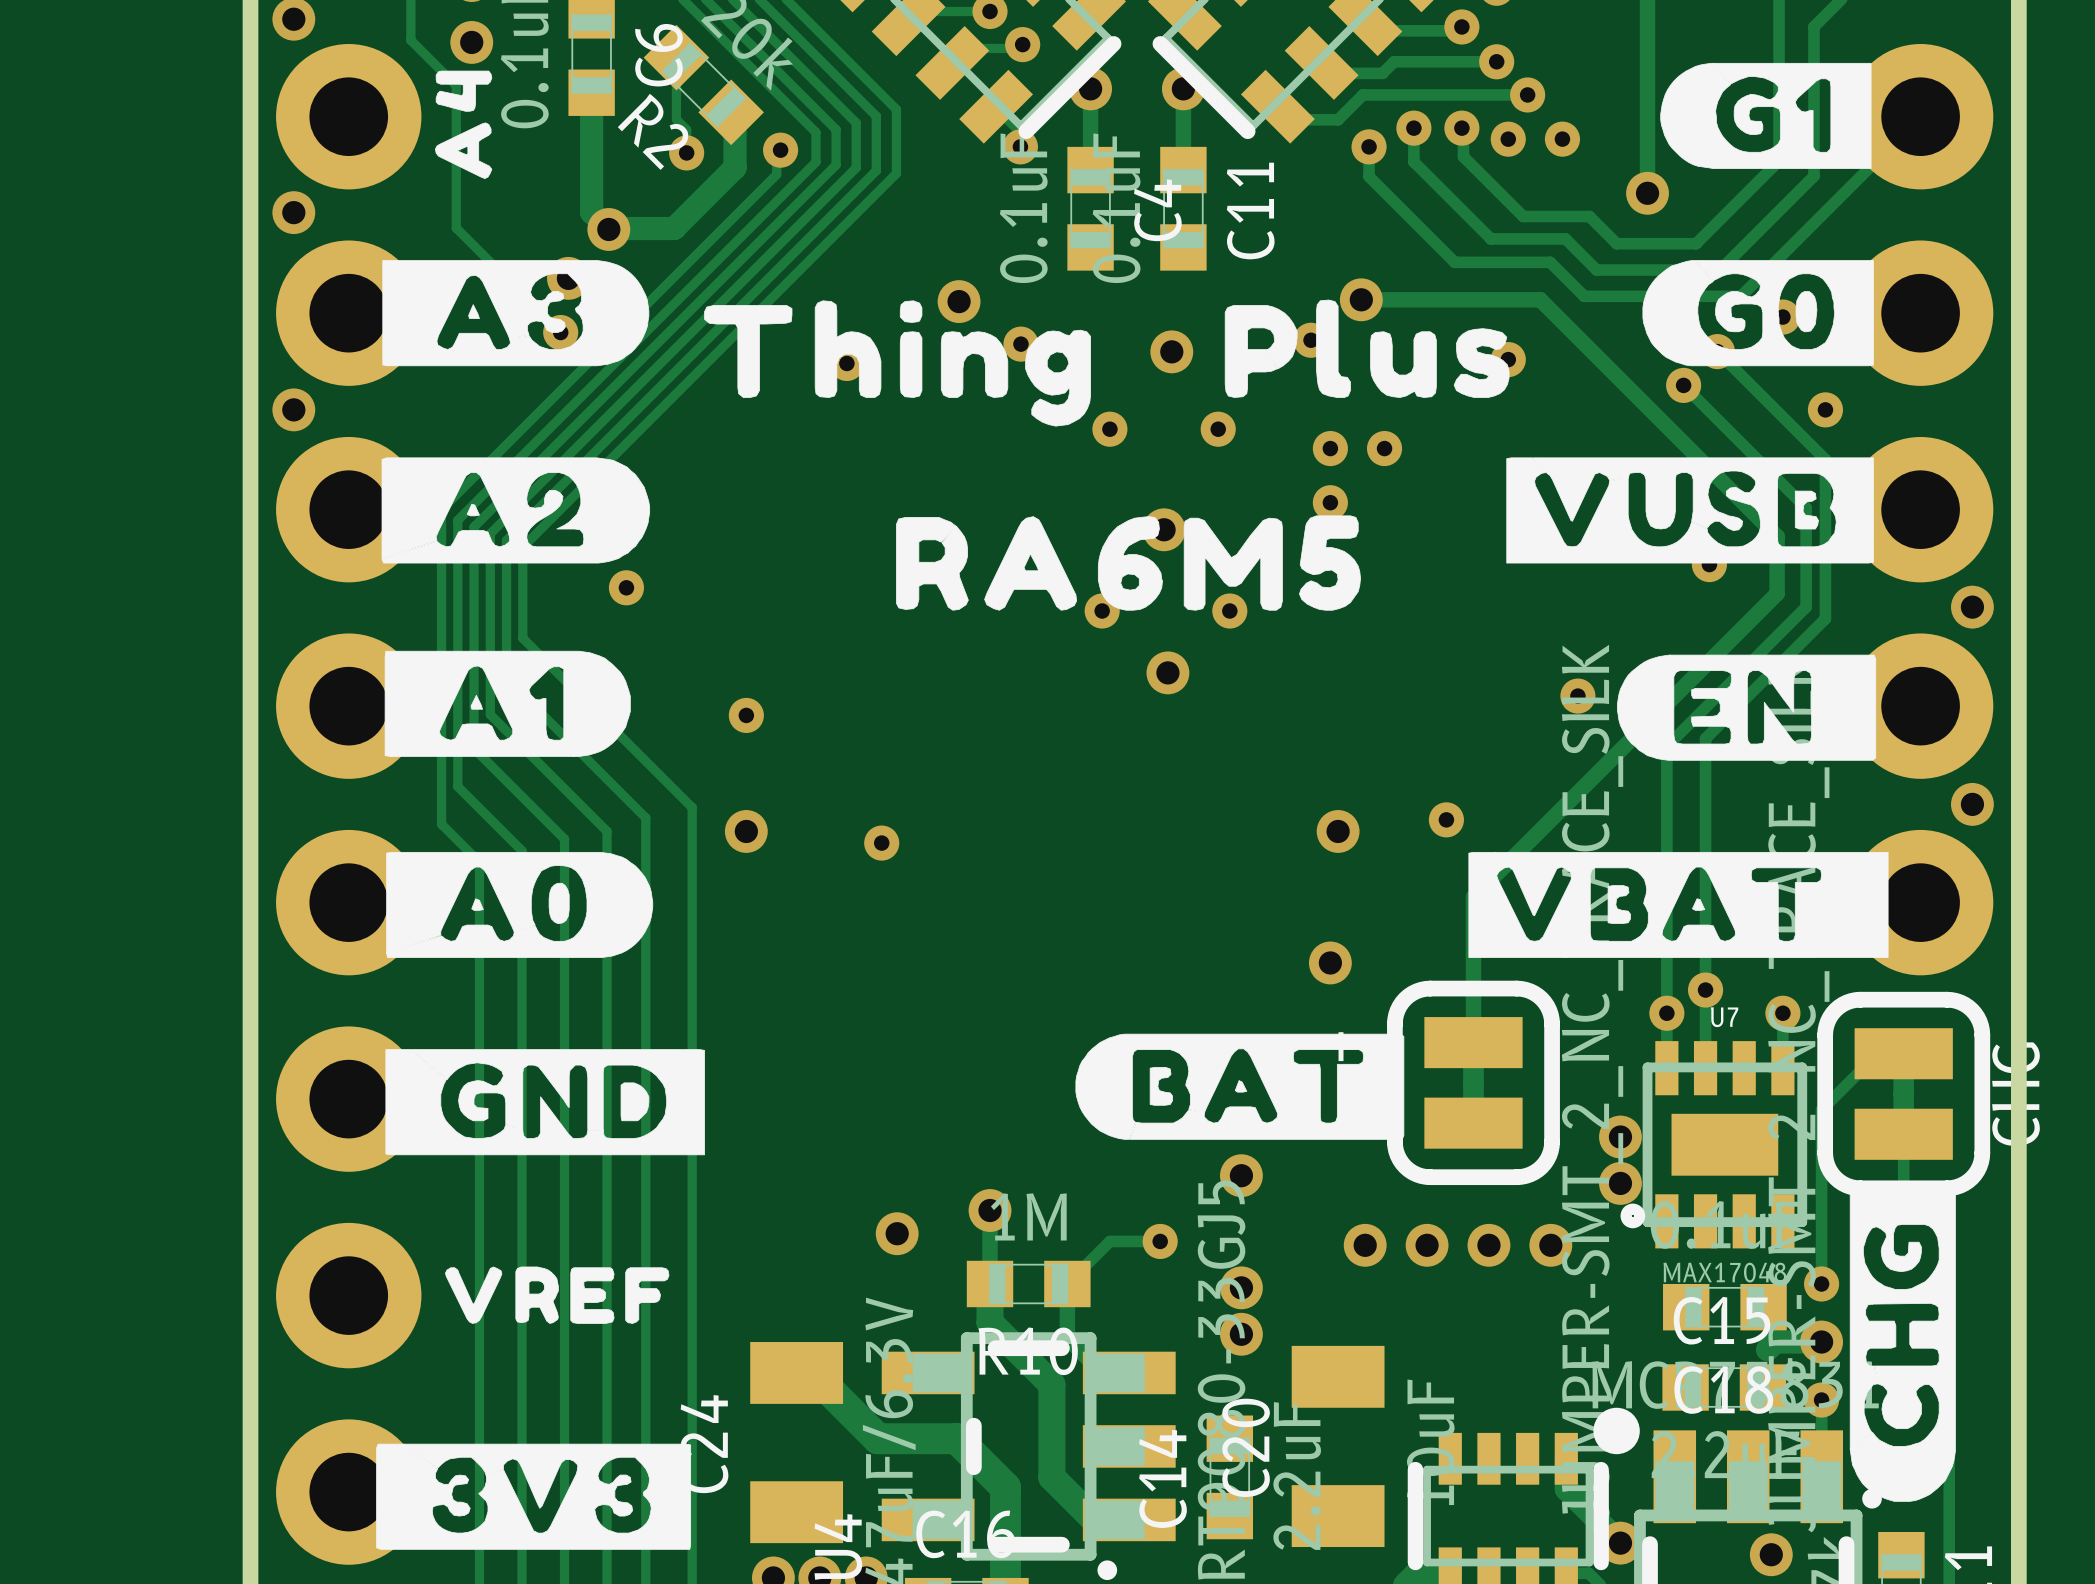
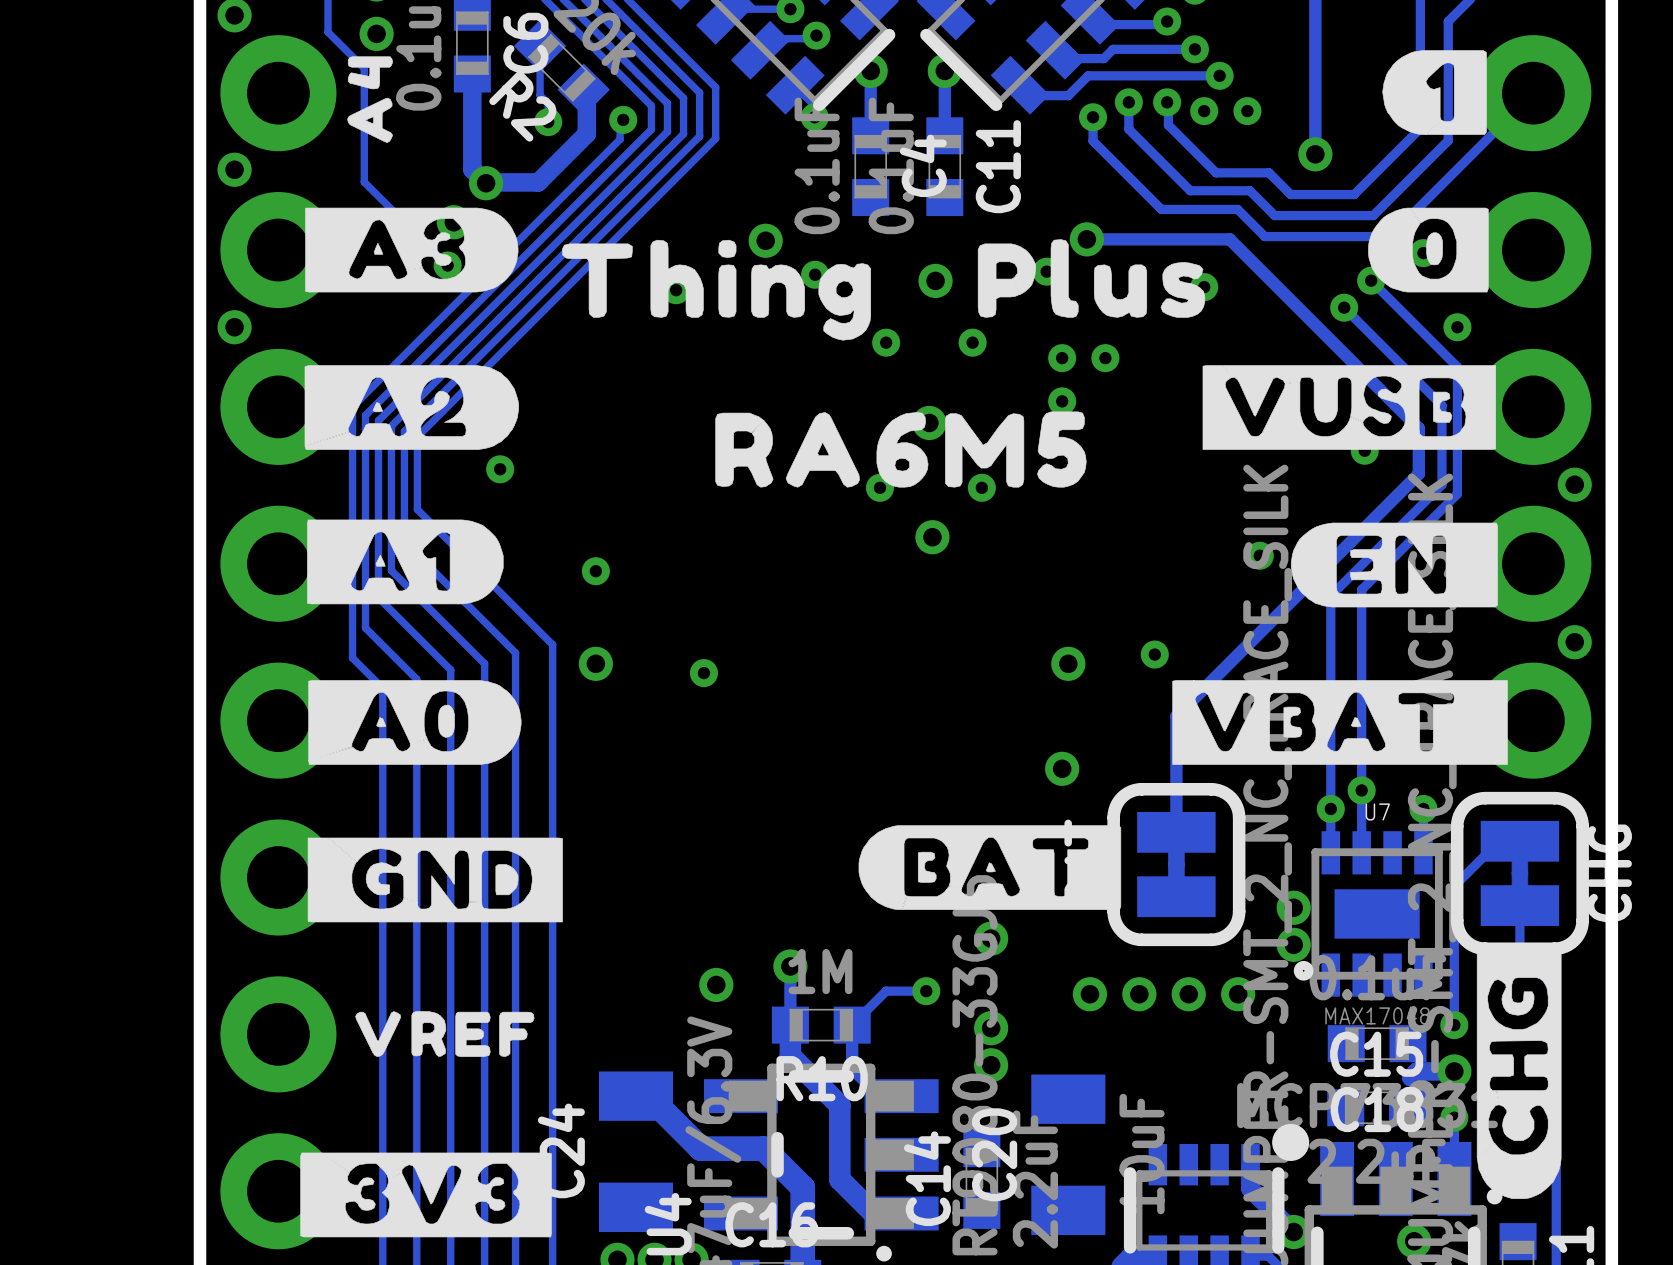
drawing shape: [1660, 62, 1872, 169] -> [1382, 50, 1487, 135]
drawing shape: [1642, 260, 1874, 367] -> [1368, 207, 1489, 293]

